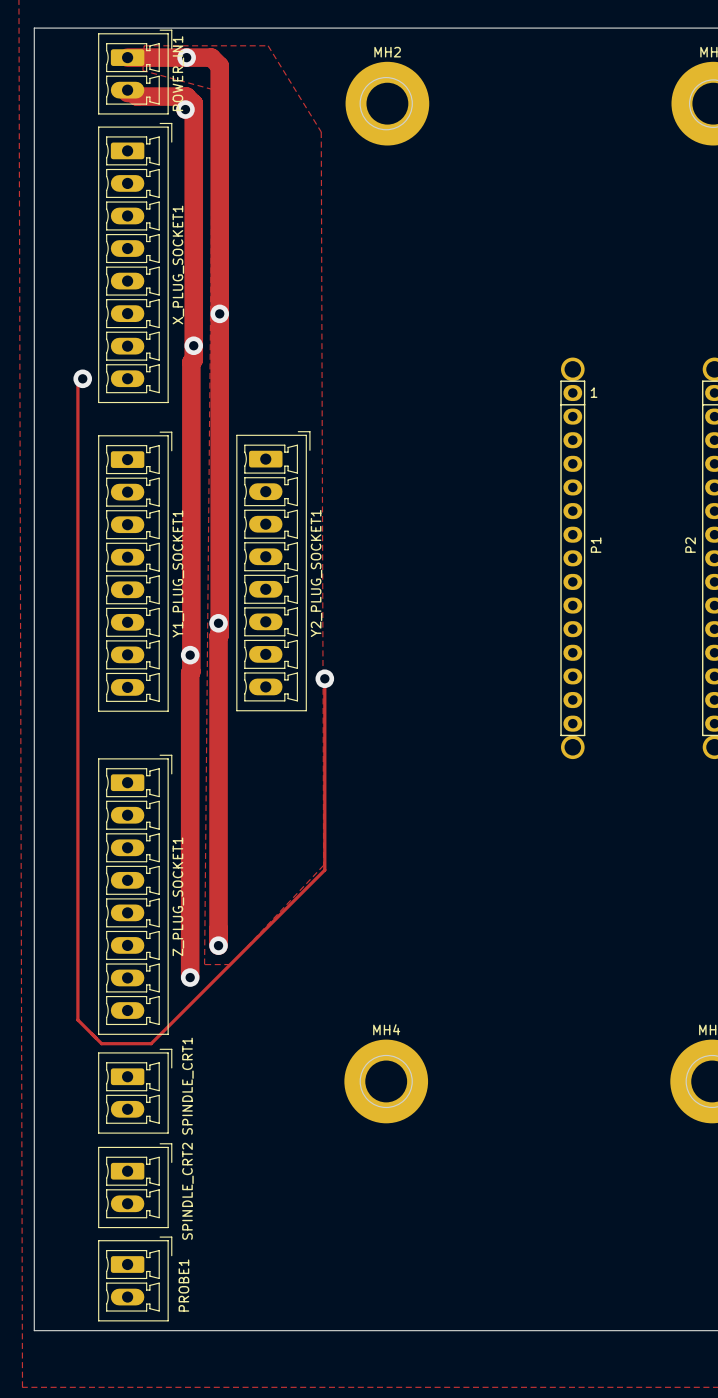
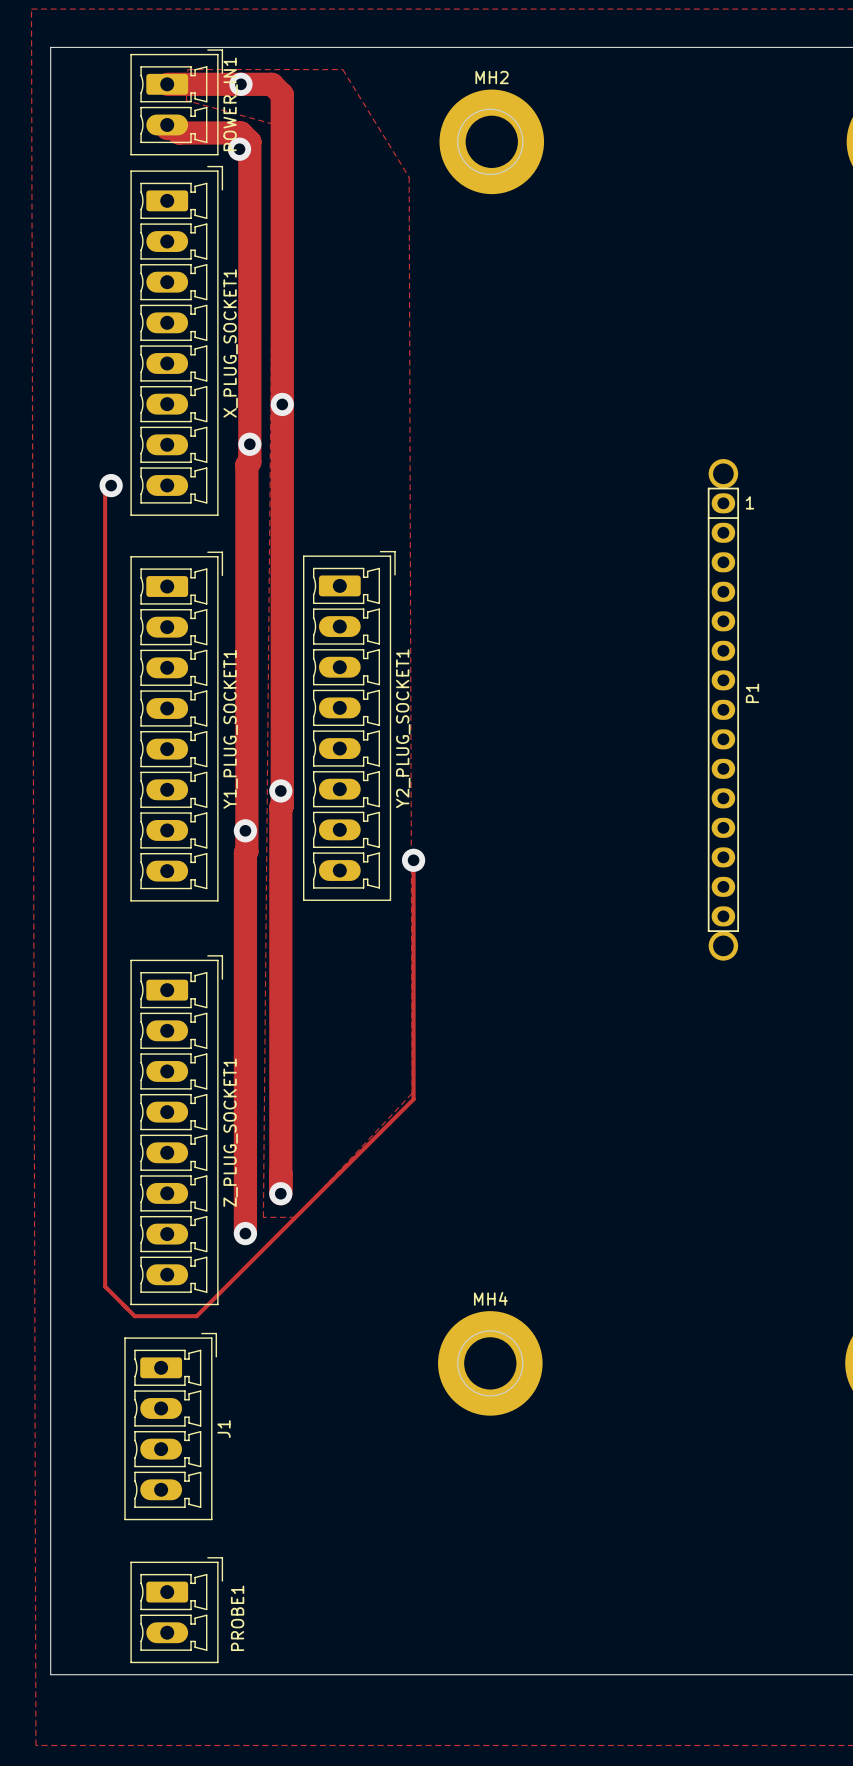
SPINDLE_CRT1: (135, 1091) -> none
J1: none -> (170, 1426)
SPINDLE_CRT2: (135, 1185) -> none

